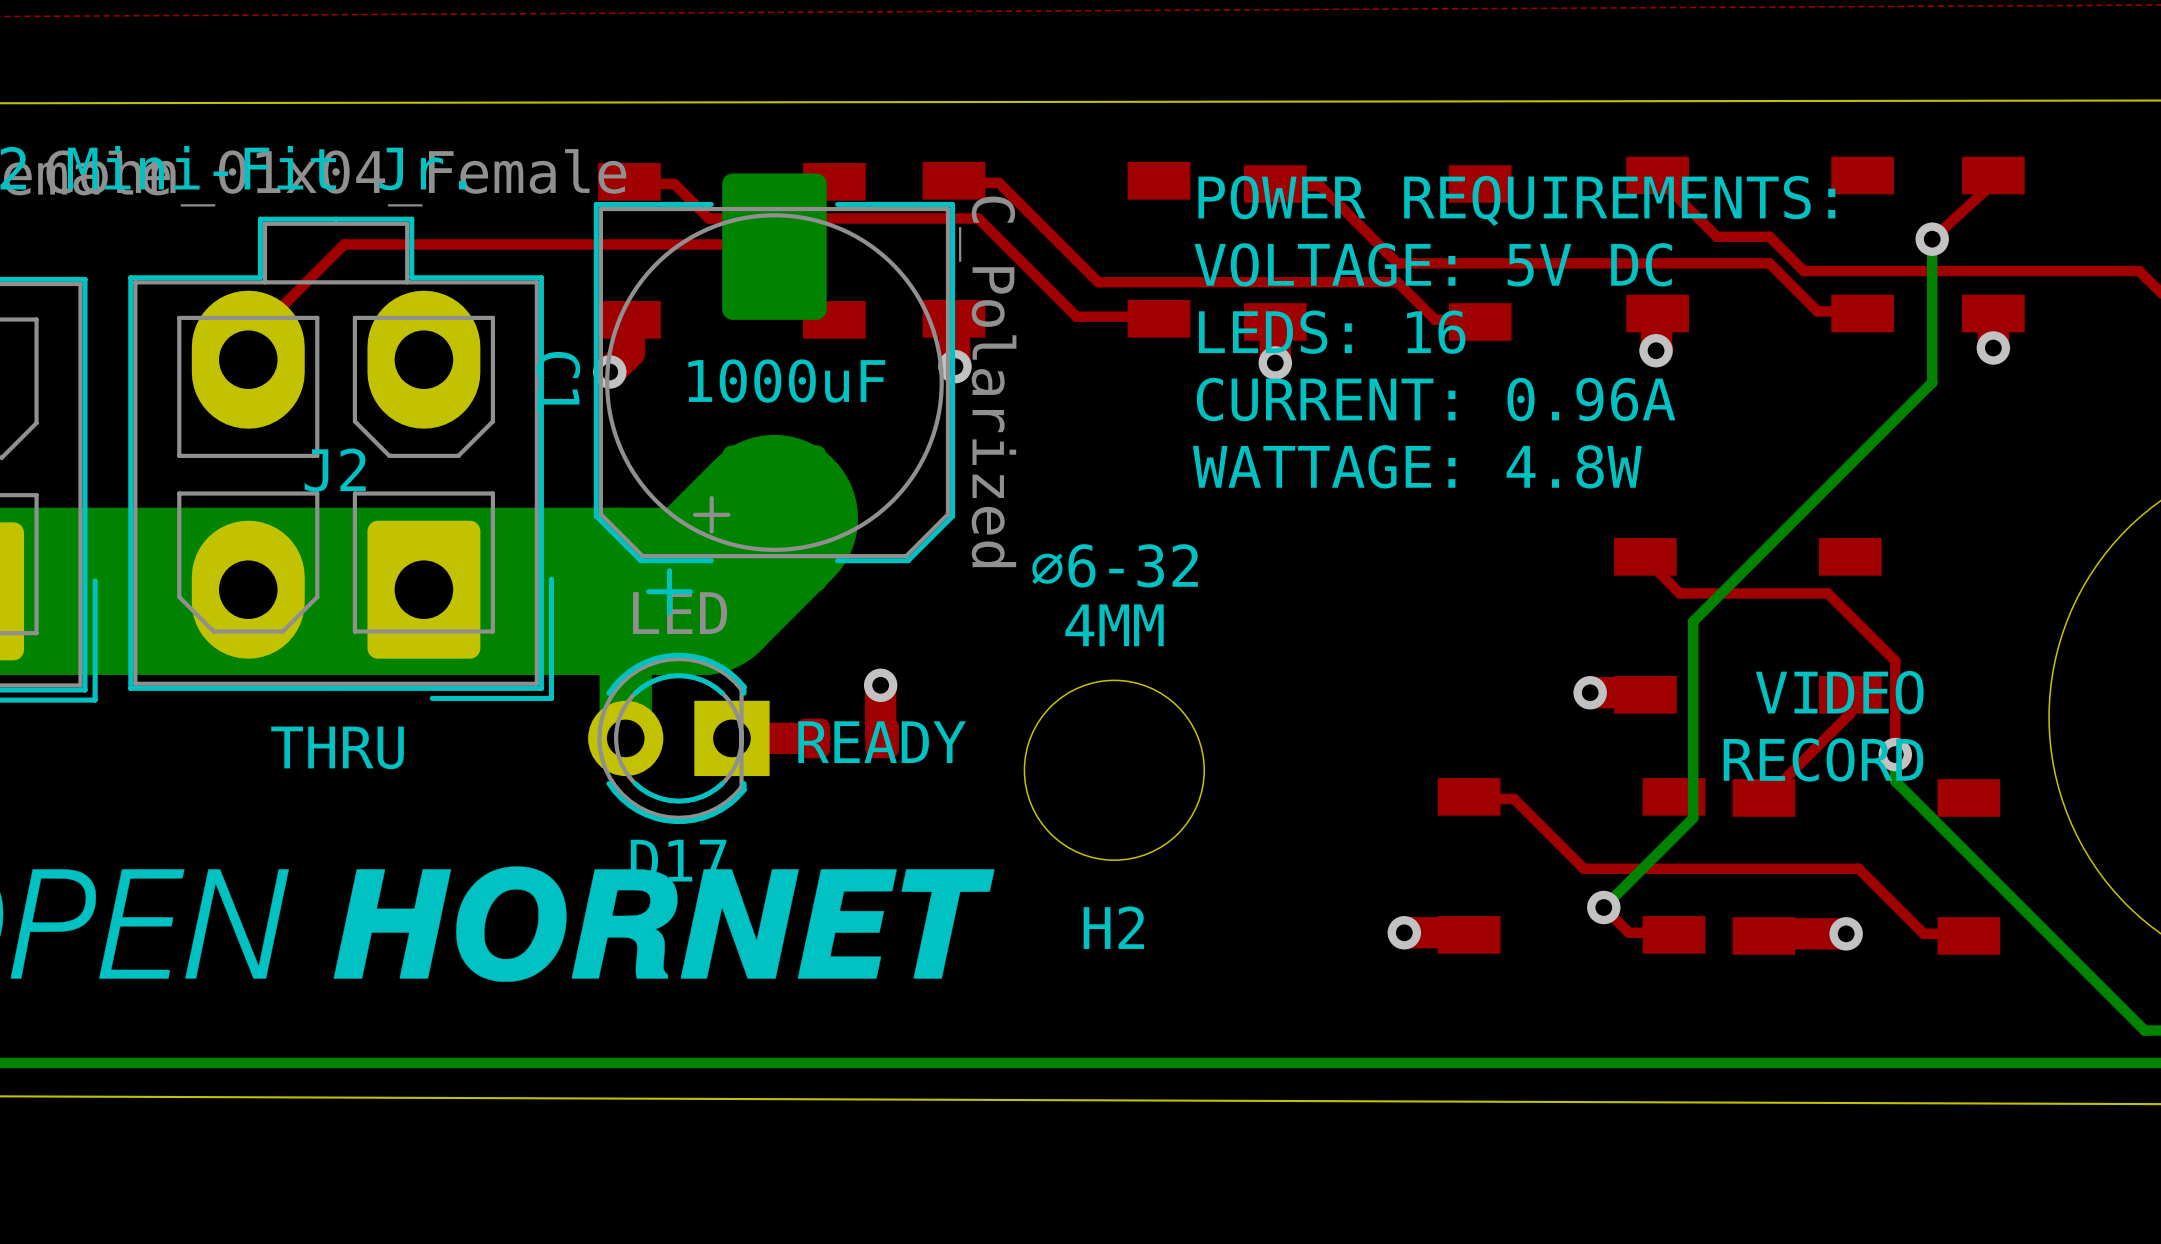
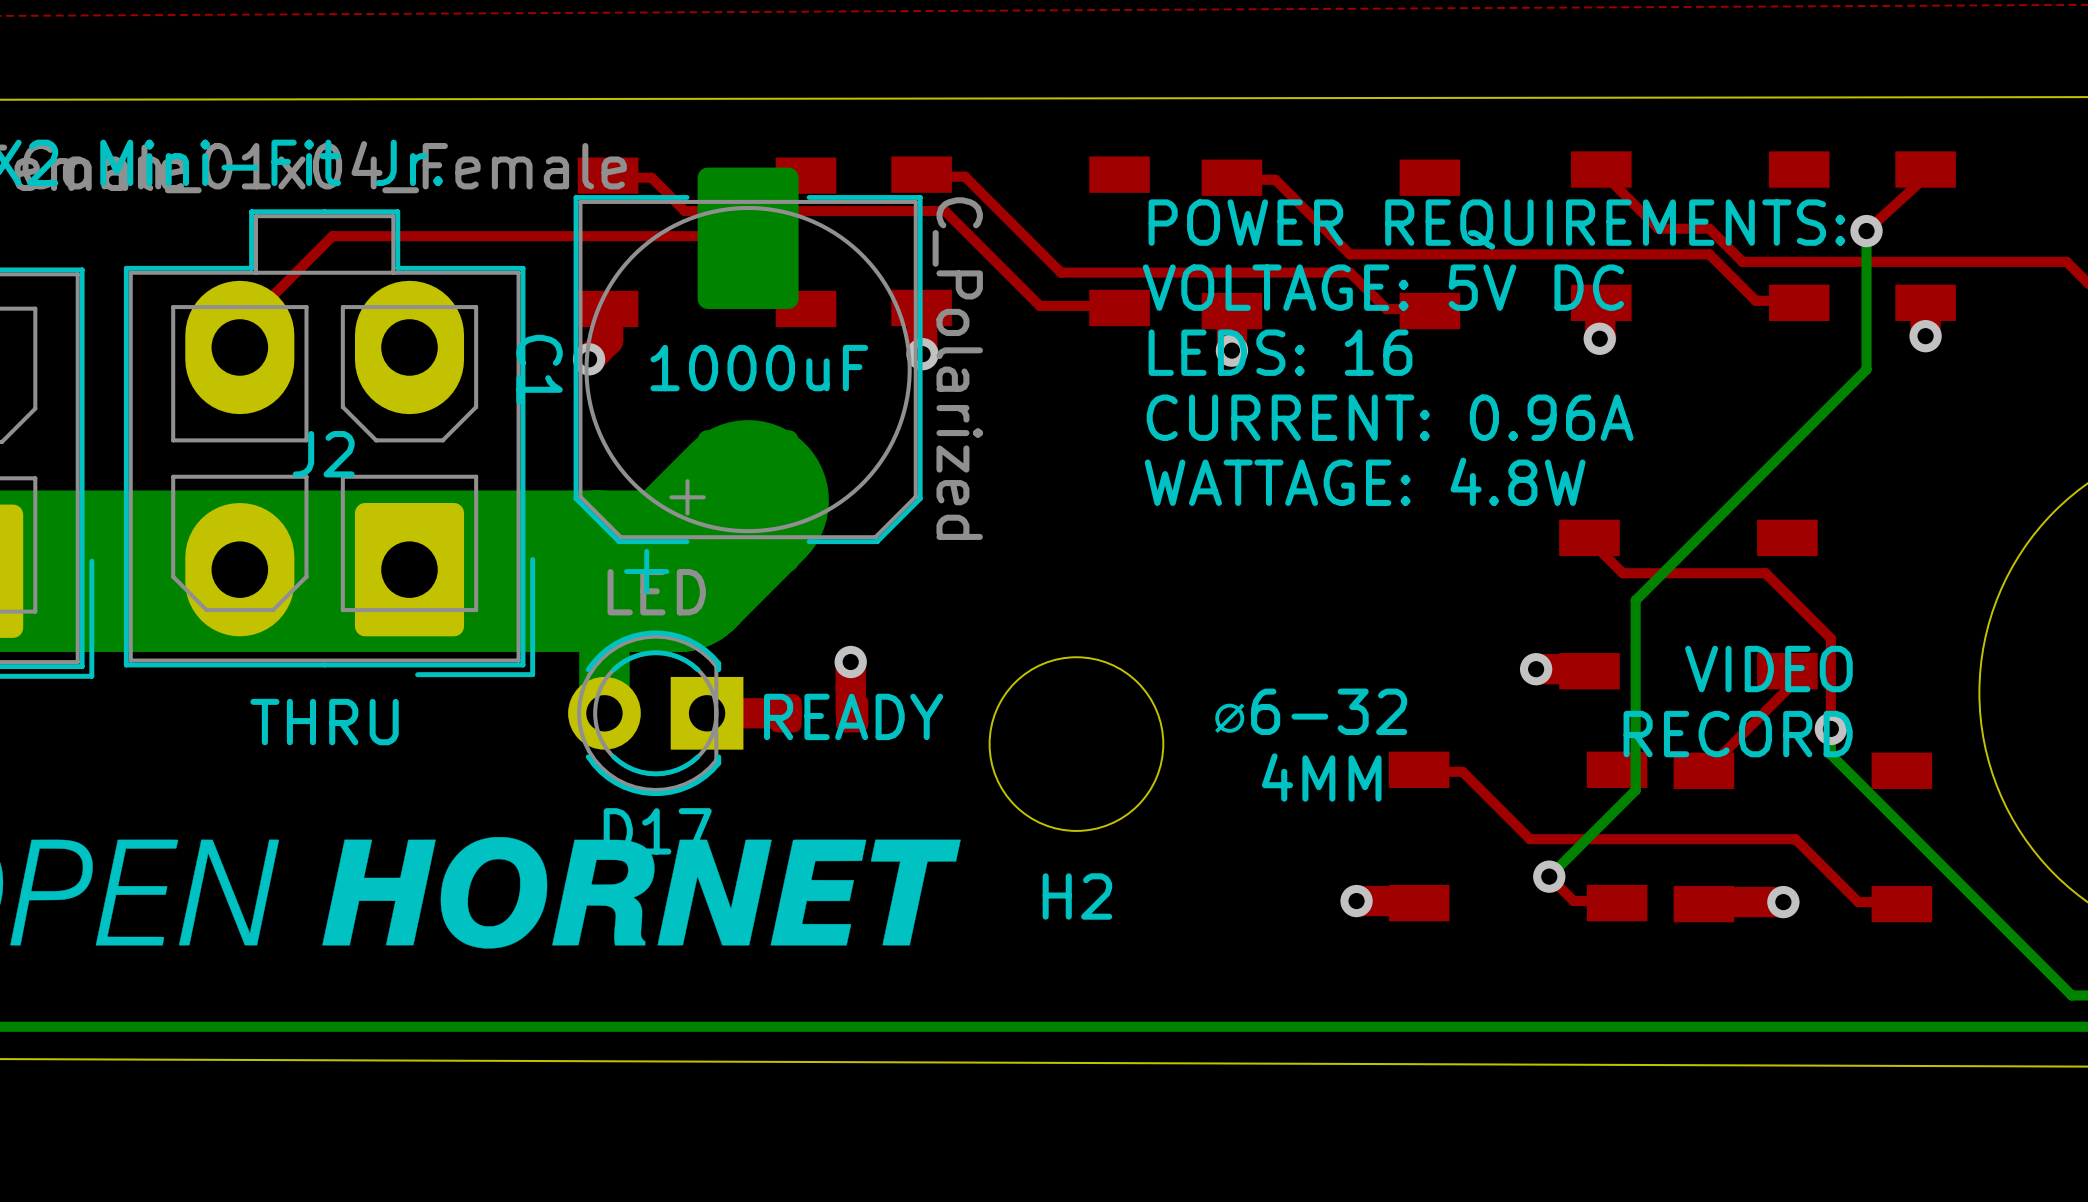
text position: POWER REQUIREMENTS: (1516, 200) -> POWER REQUIREMENTS: (1496, 224)
text position: VOLTAGE: 5V DC (1433, 264) -> VOLTAGE: 5V DC (1383, 287)
text position: LEDS: 16 (1332, 332) -> LEDS: 16 (1280, 352)
text position: CURRENT: 0.96A (1436, 399) -> CURRENT: 0.96A (1390, 417)
text position: WATTAGE: 4.8W (1417, 466) -> WATTAGE: 4.8W (1365, 481)
part text position: ⌀6-32 (1115, 565) -> ⌀6-32 (1309, 712)
text position: 4MM (1114, 625) -> 4MM (1321, 777)

